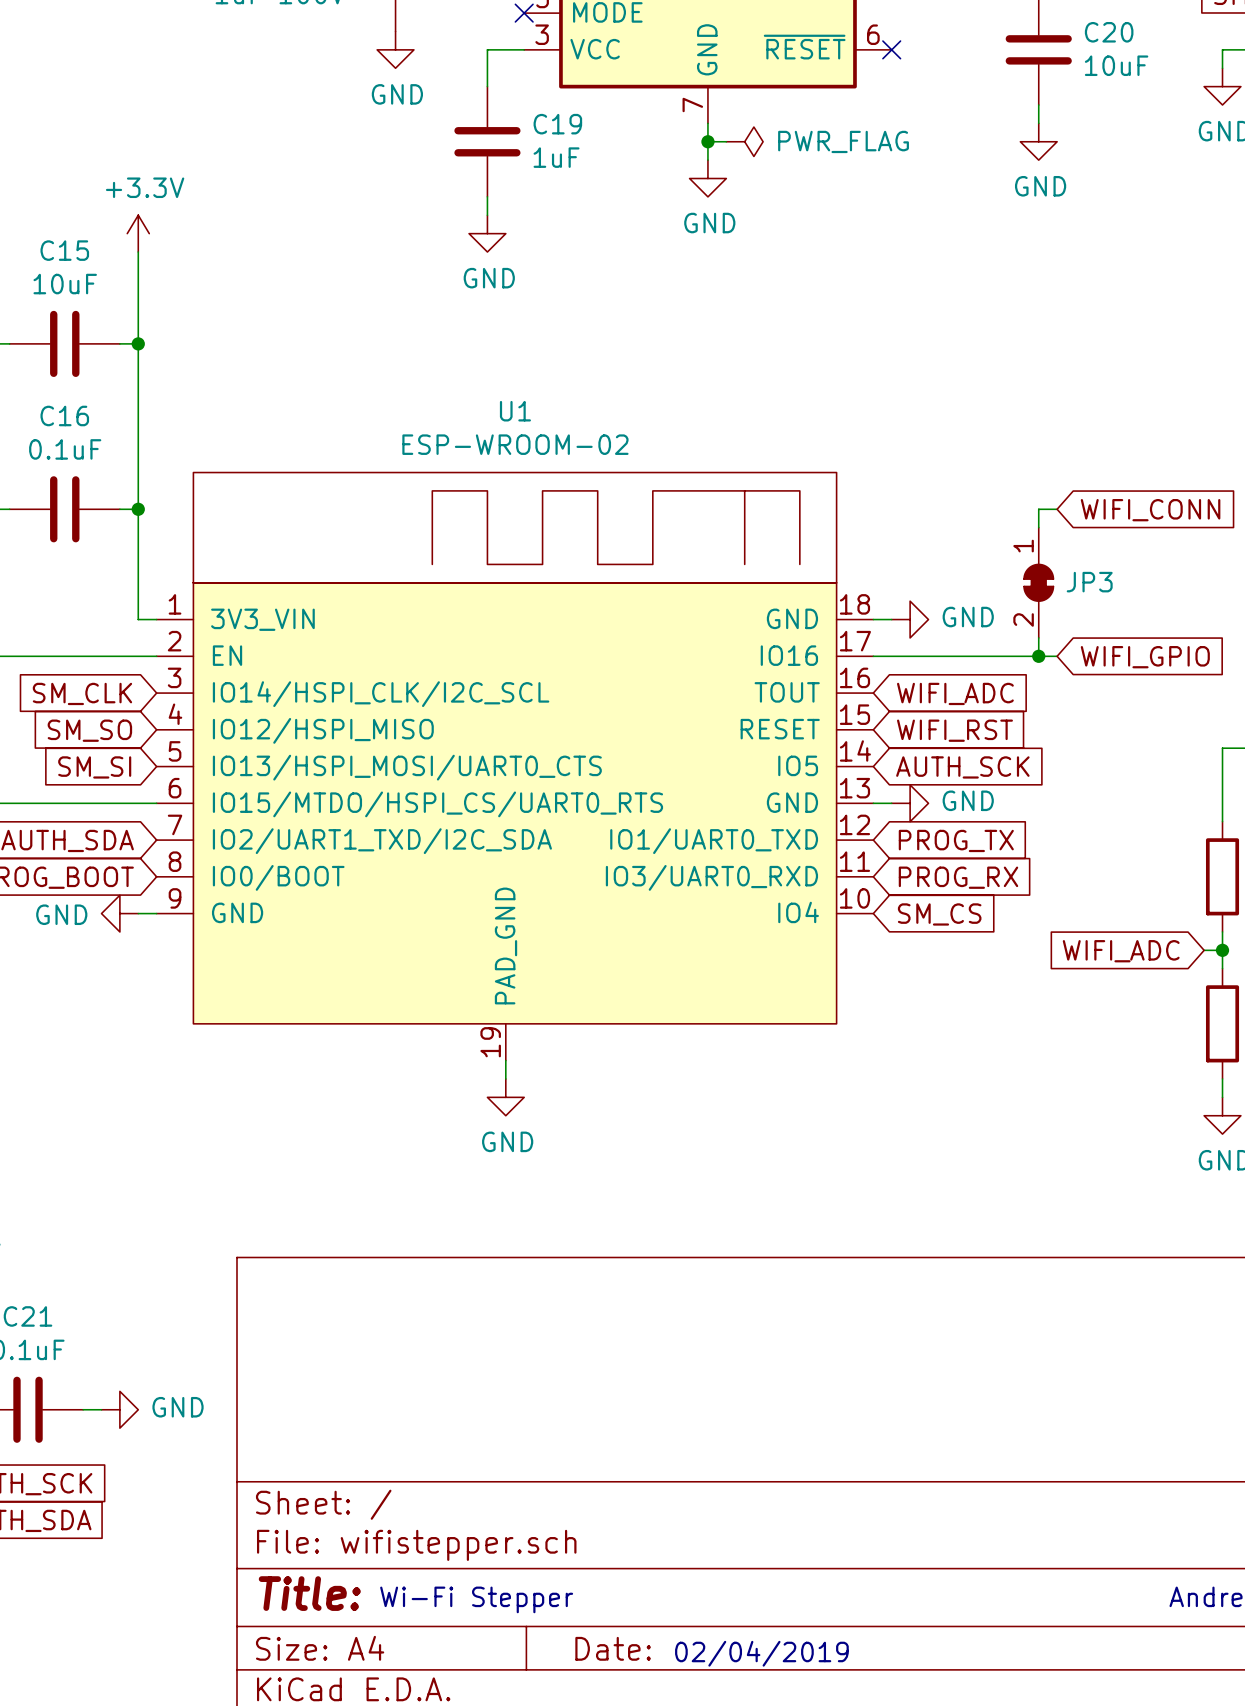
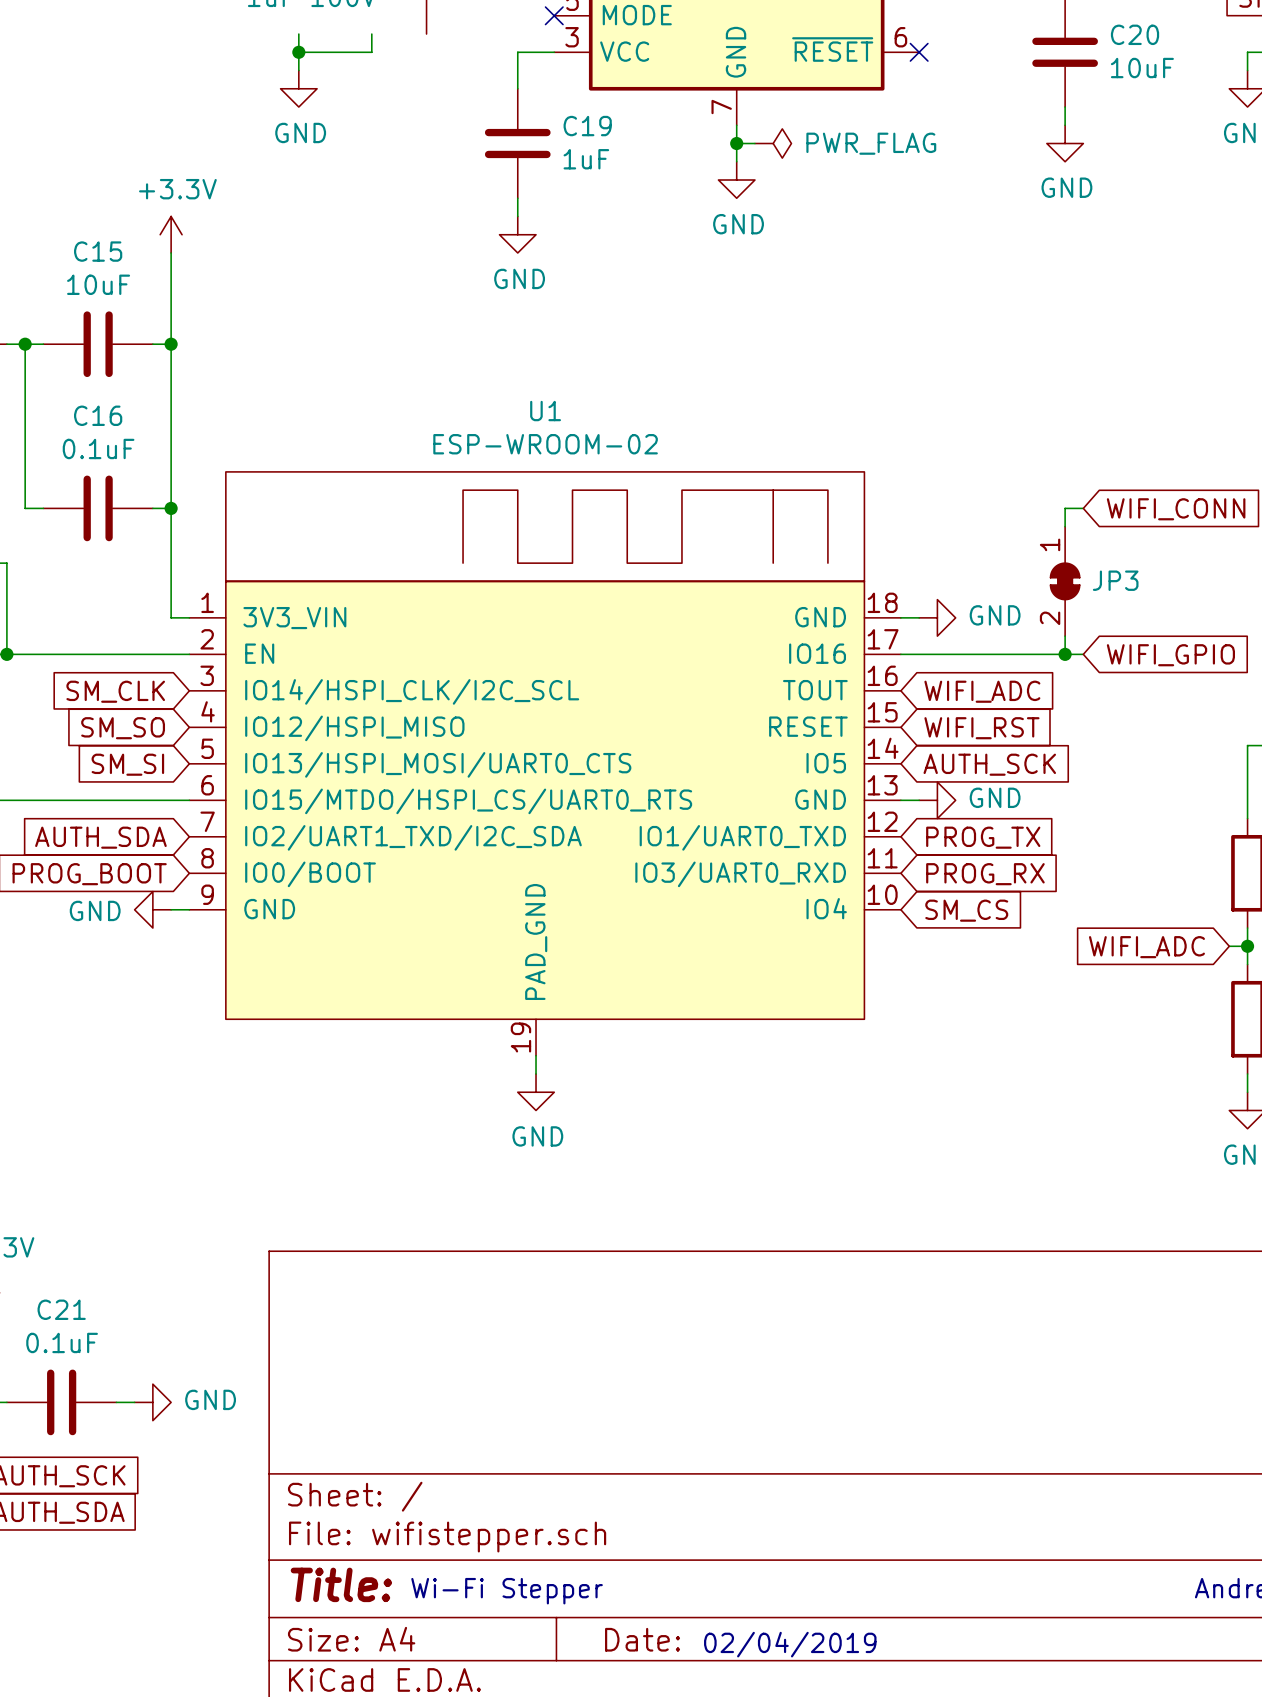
wire: none -> (298, 34) (298, 70)
wire: none -> (371, 34) (371, 52) (298, 52)
junction: none -> (298, 52)
power symbol position: GND (395, 49) -> GND (298, 88)

